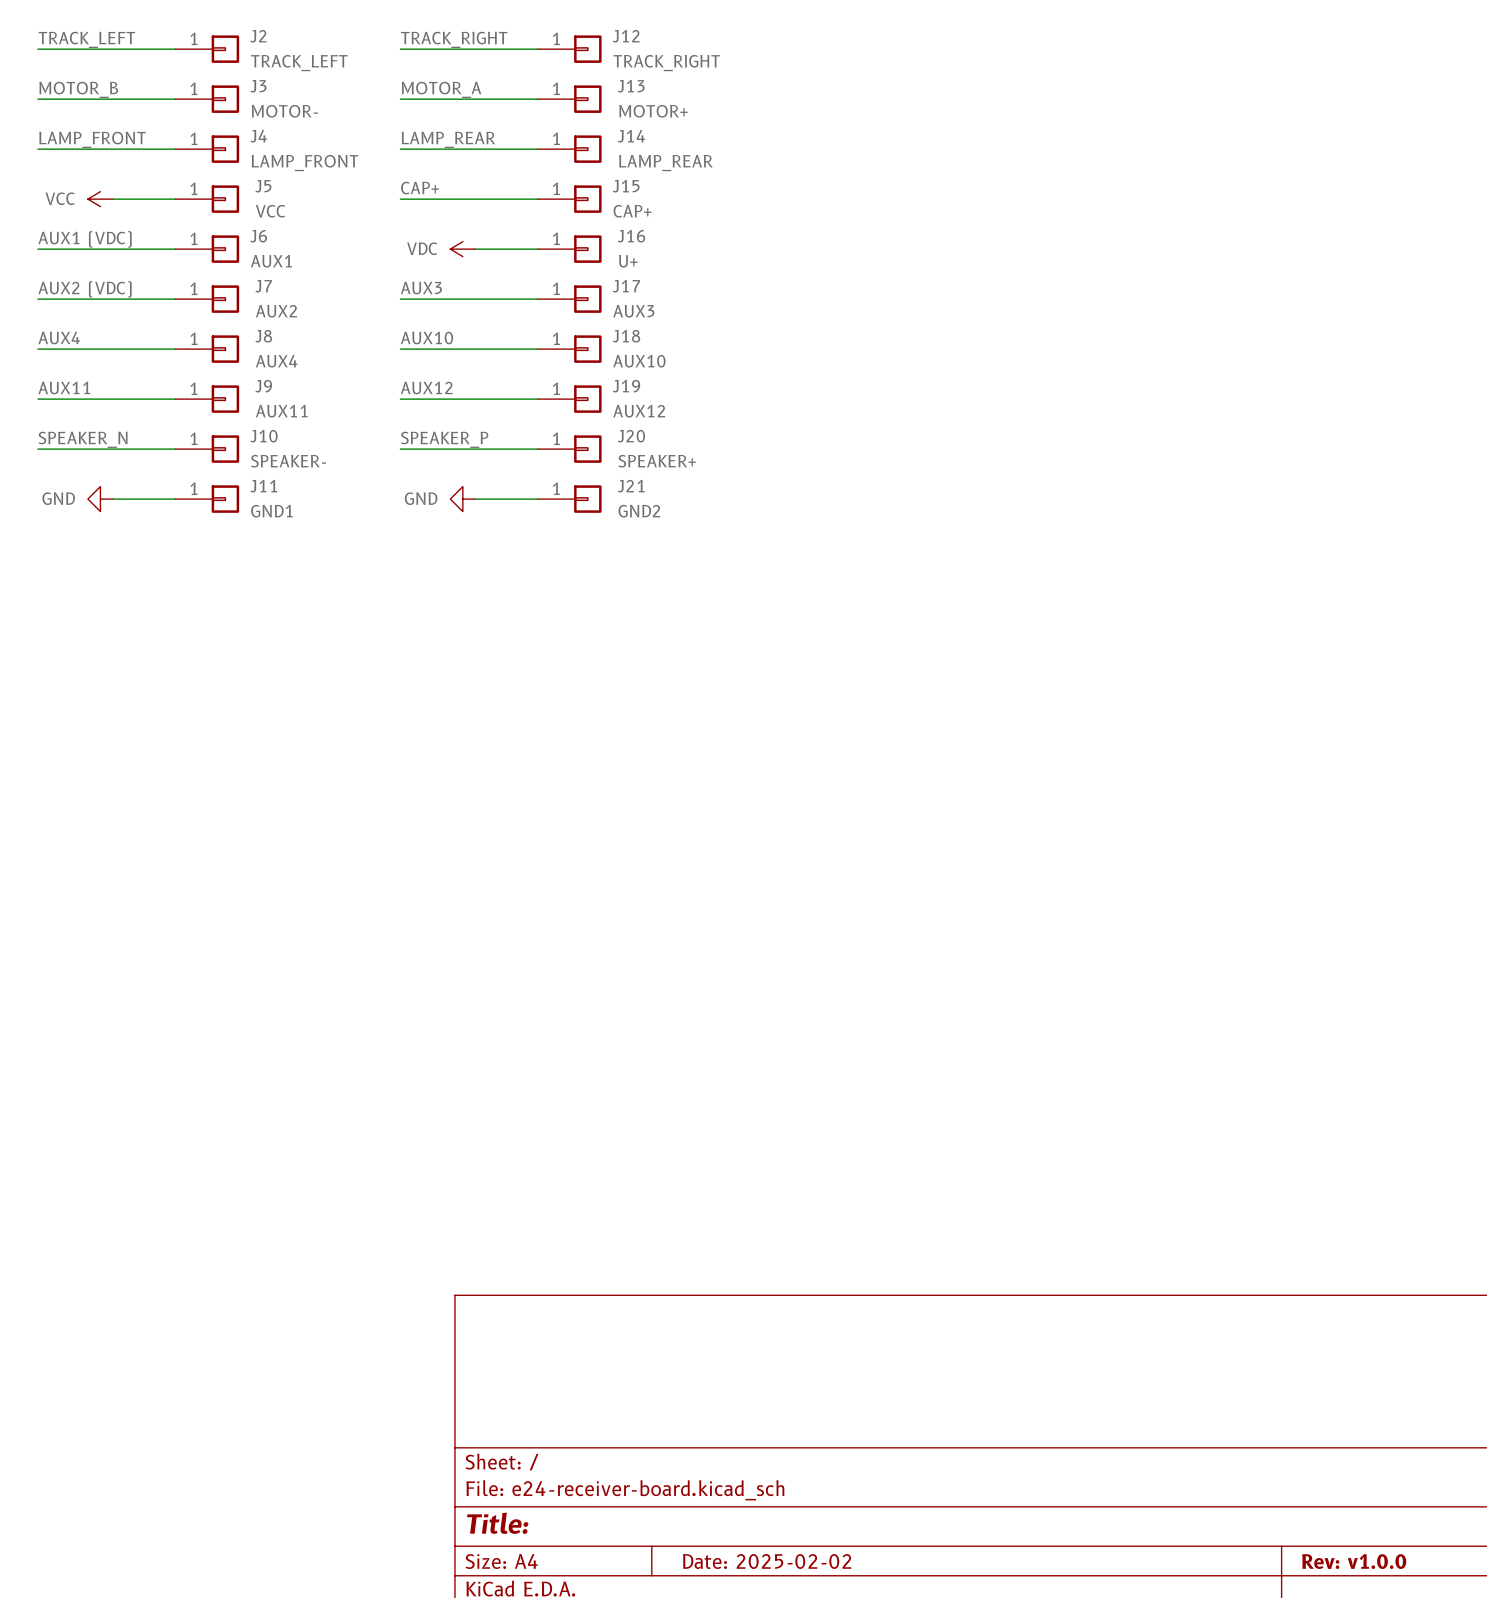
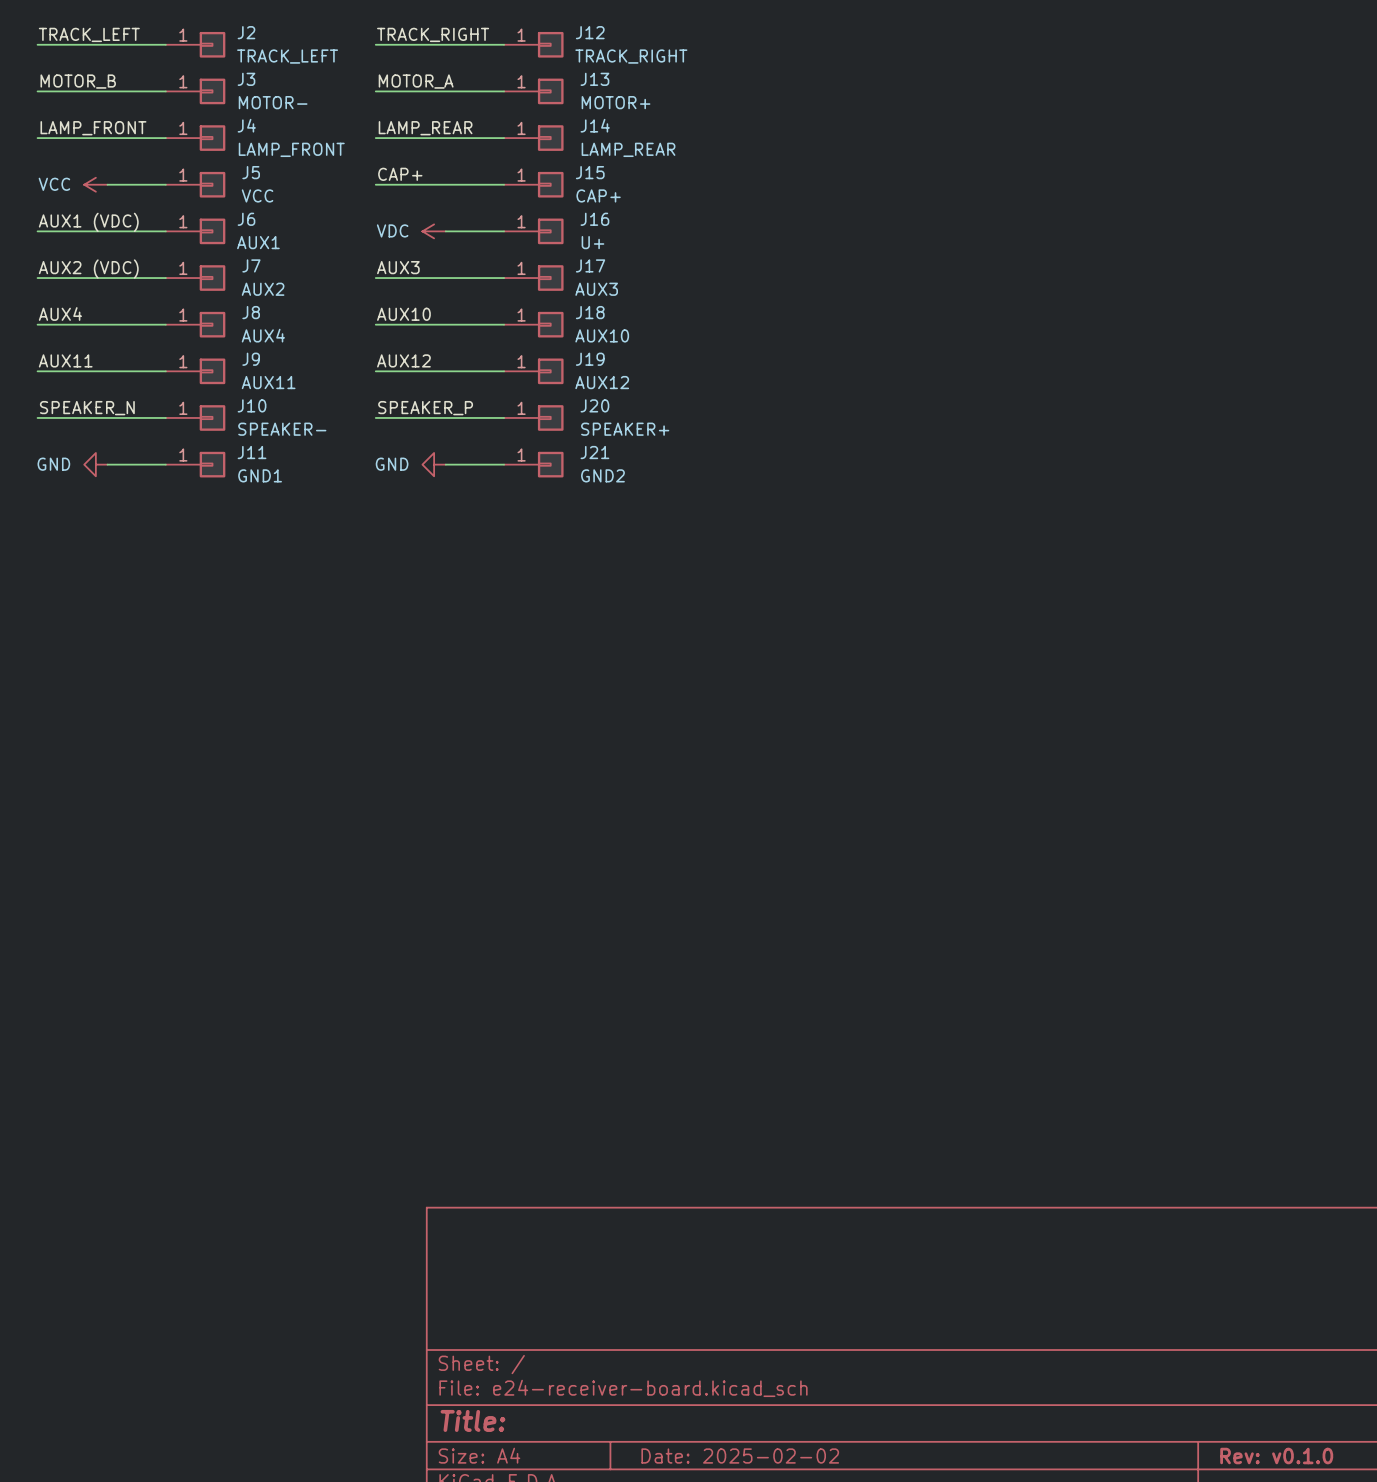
title block: Rev: v1.0.0 (1354, 1561) -> Rev: v0.1.0 (1276, 1456)

